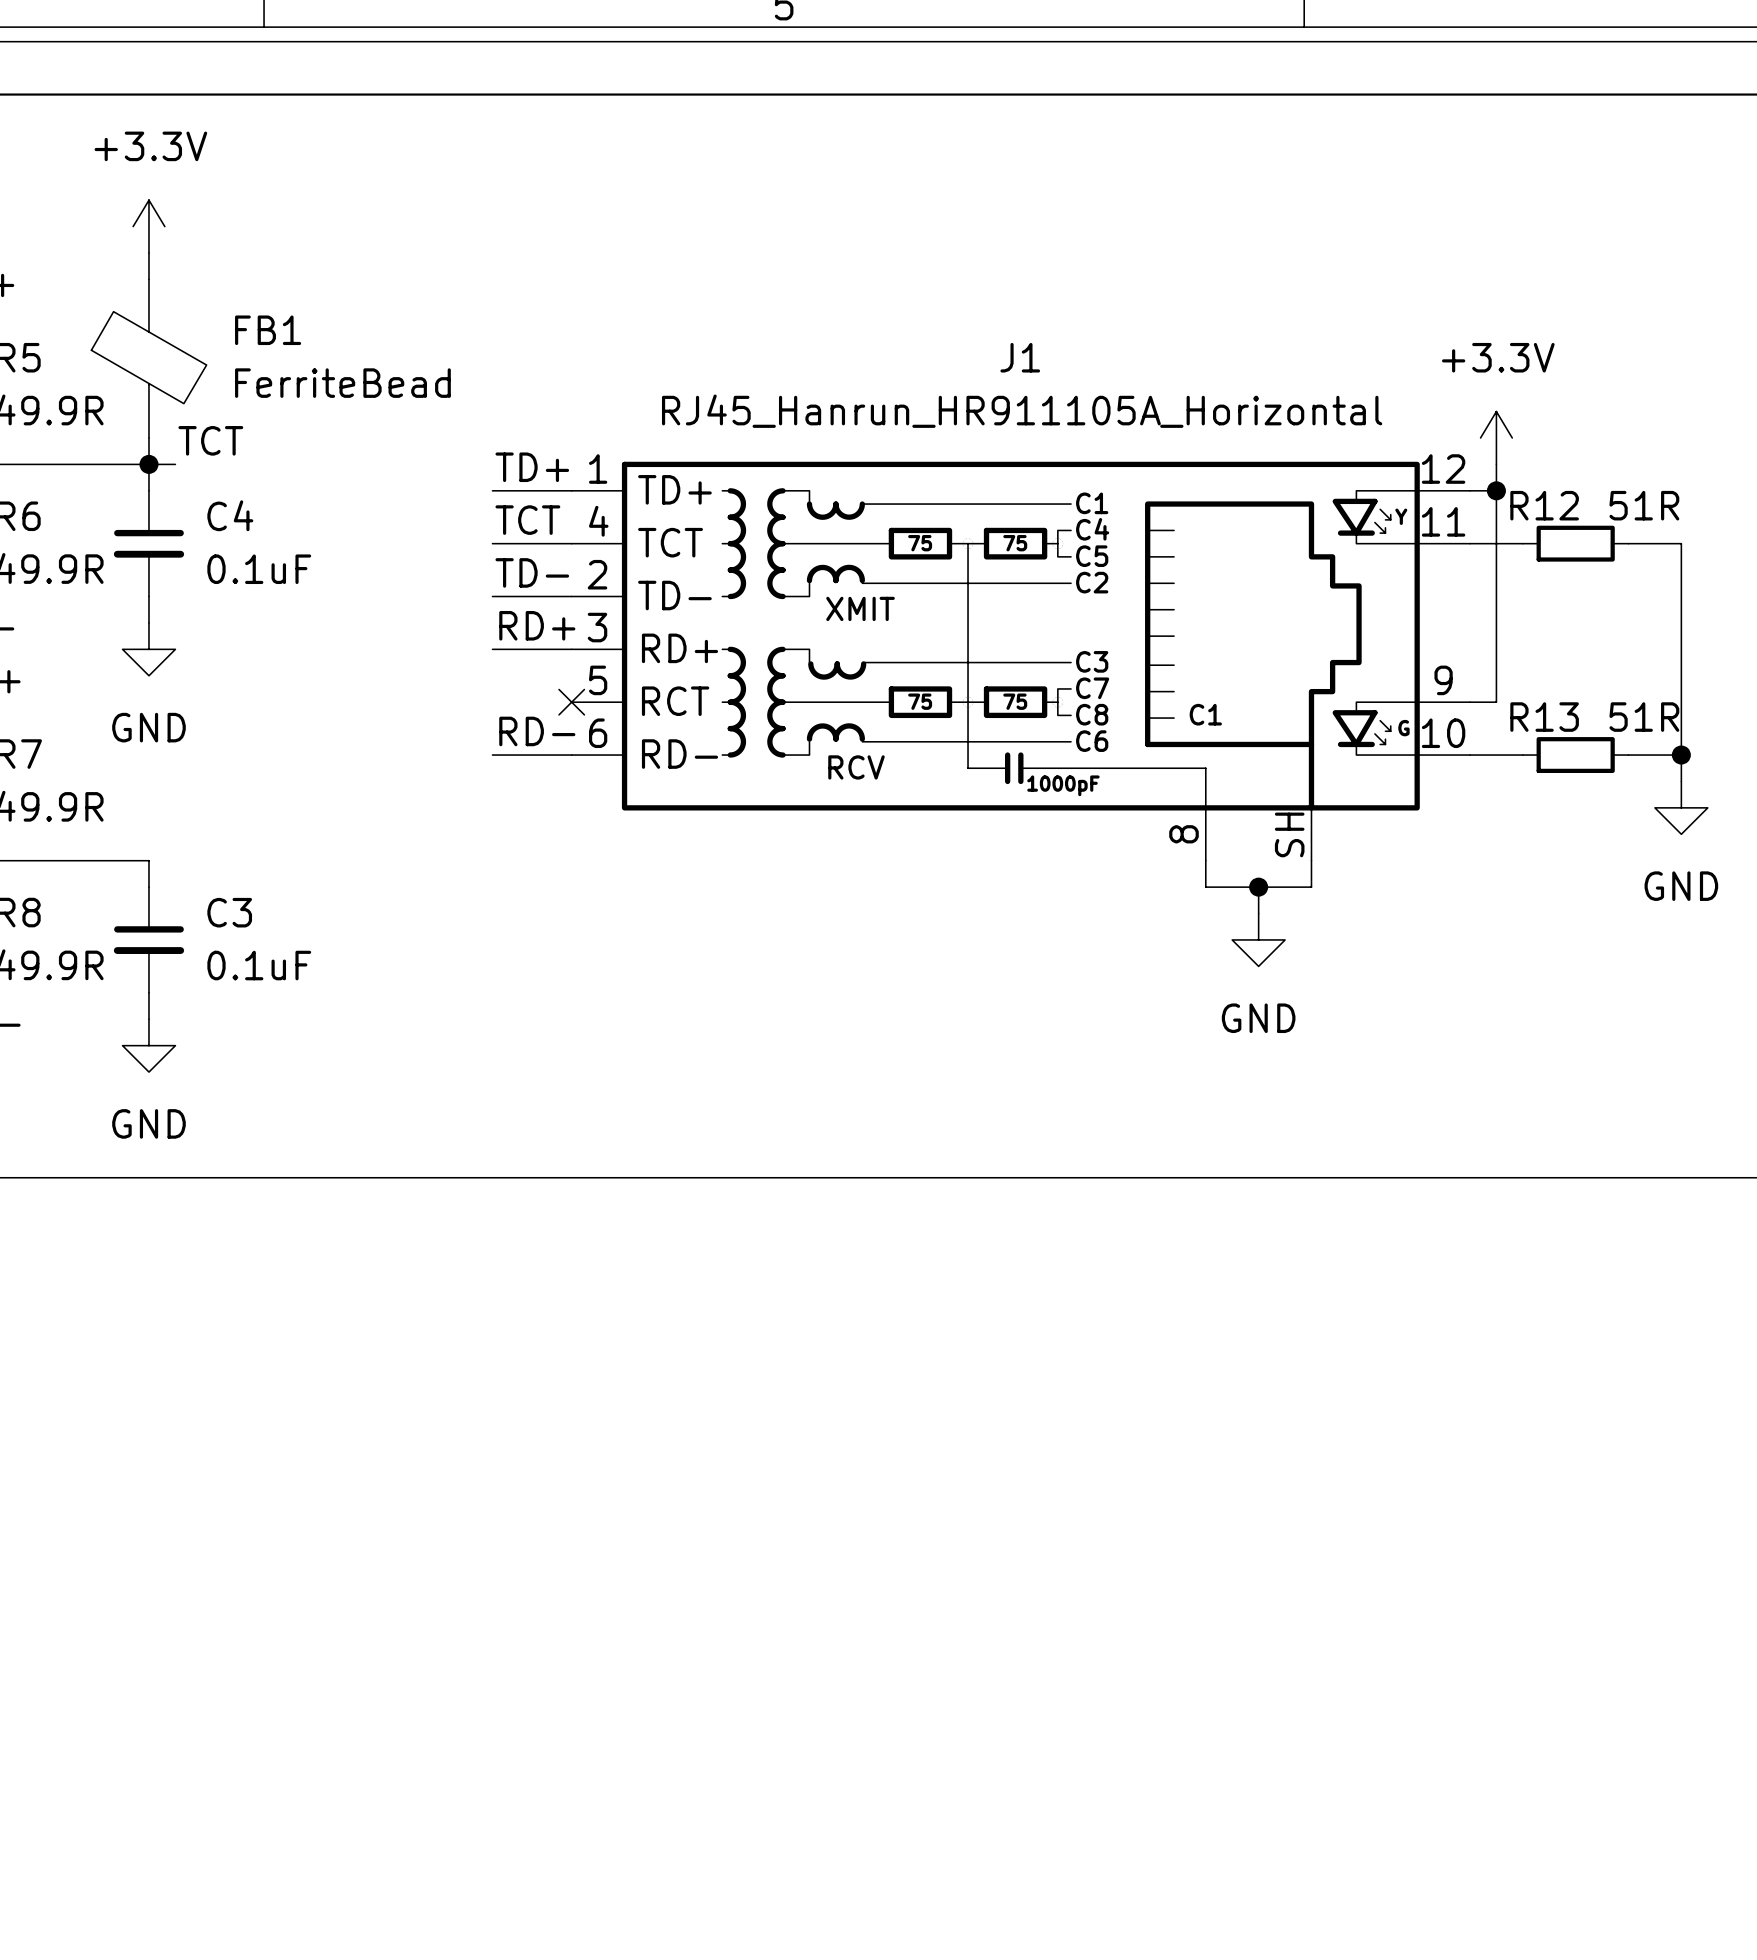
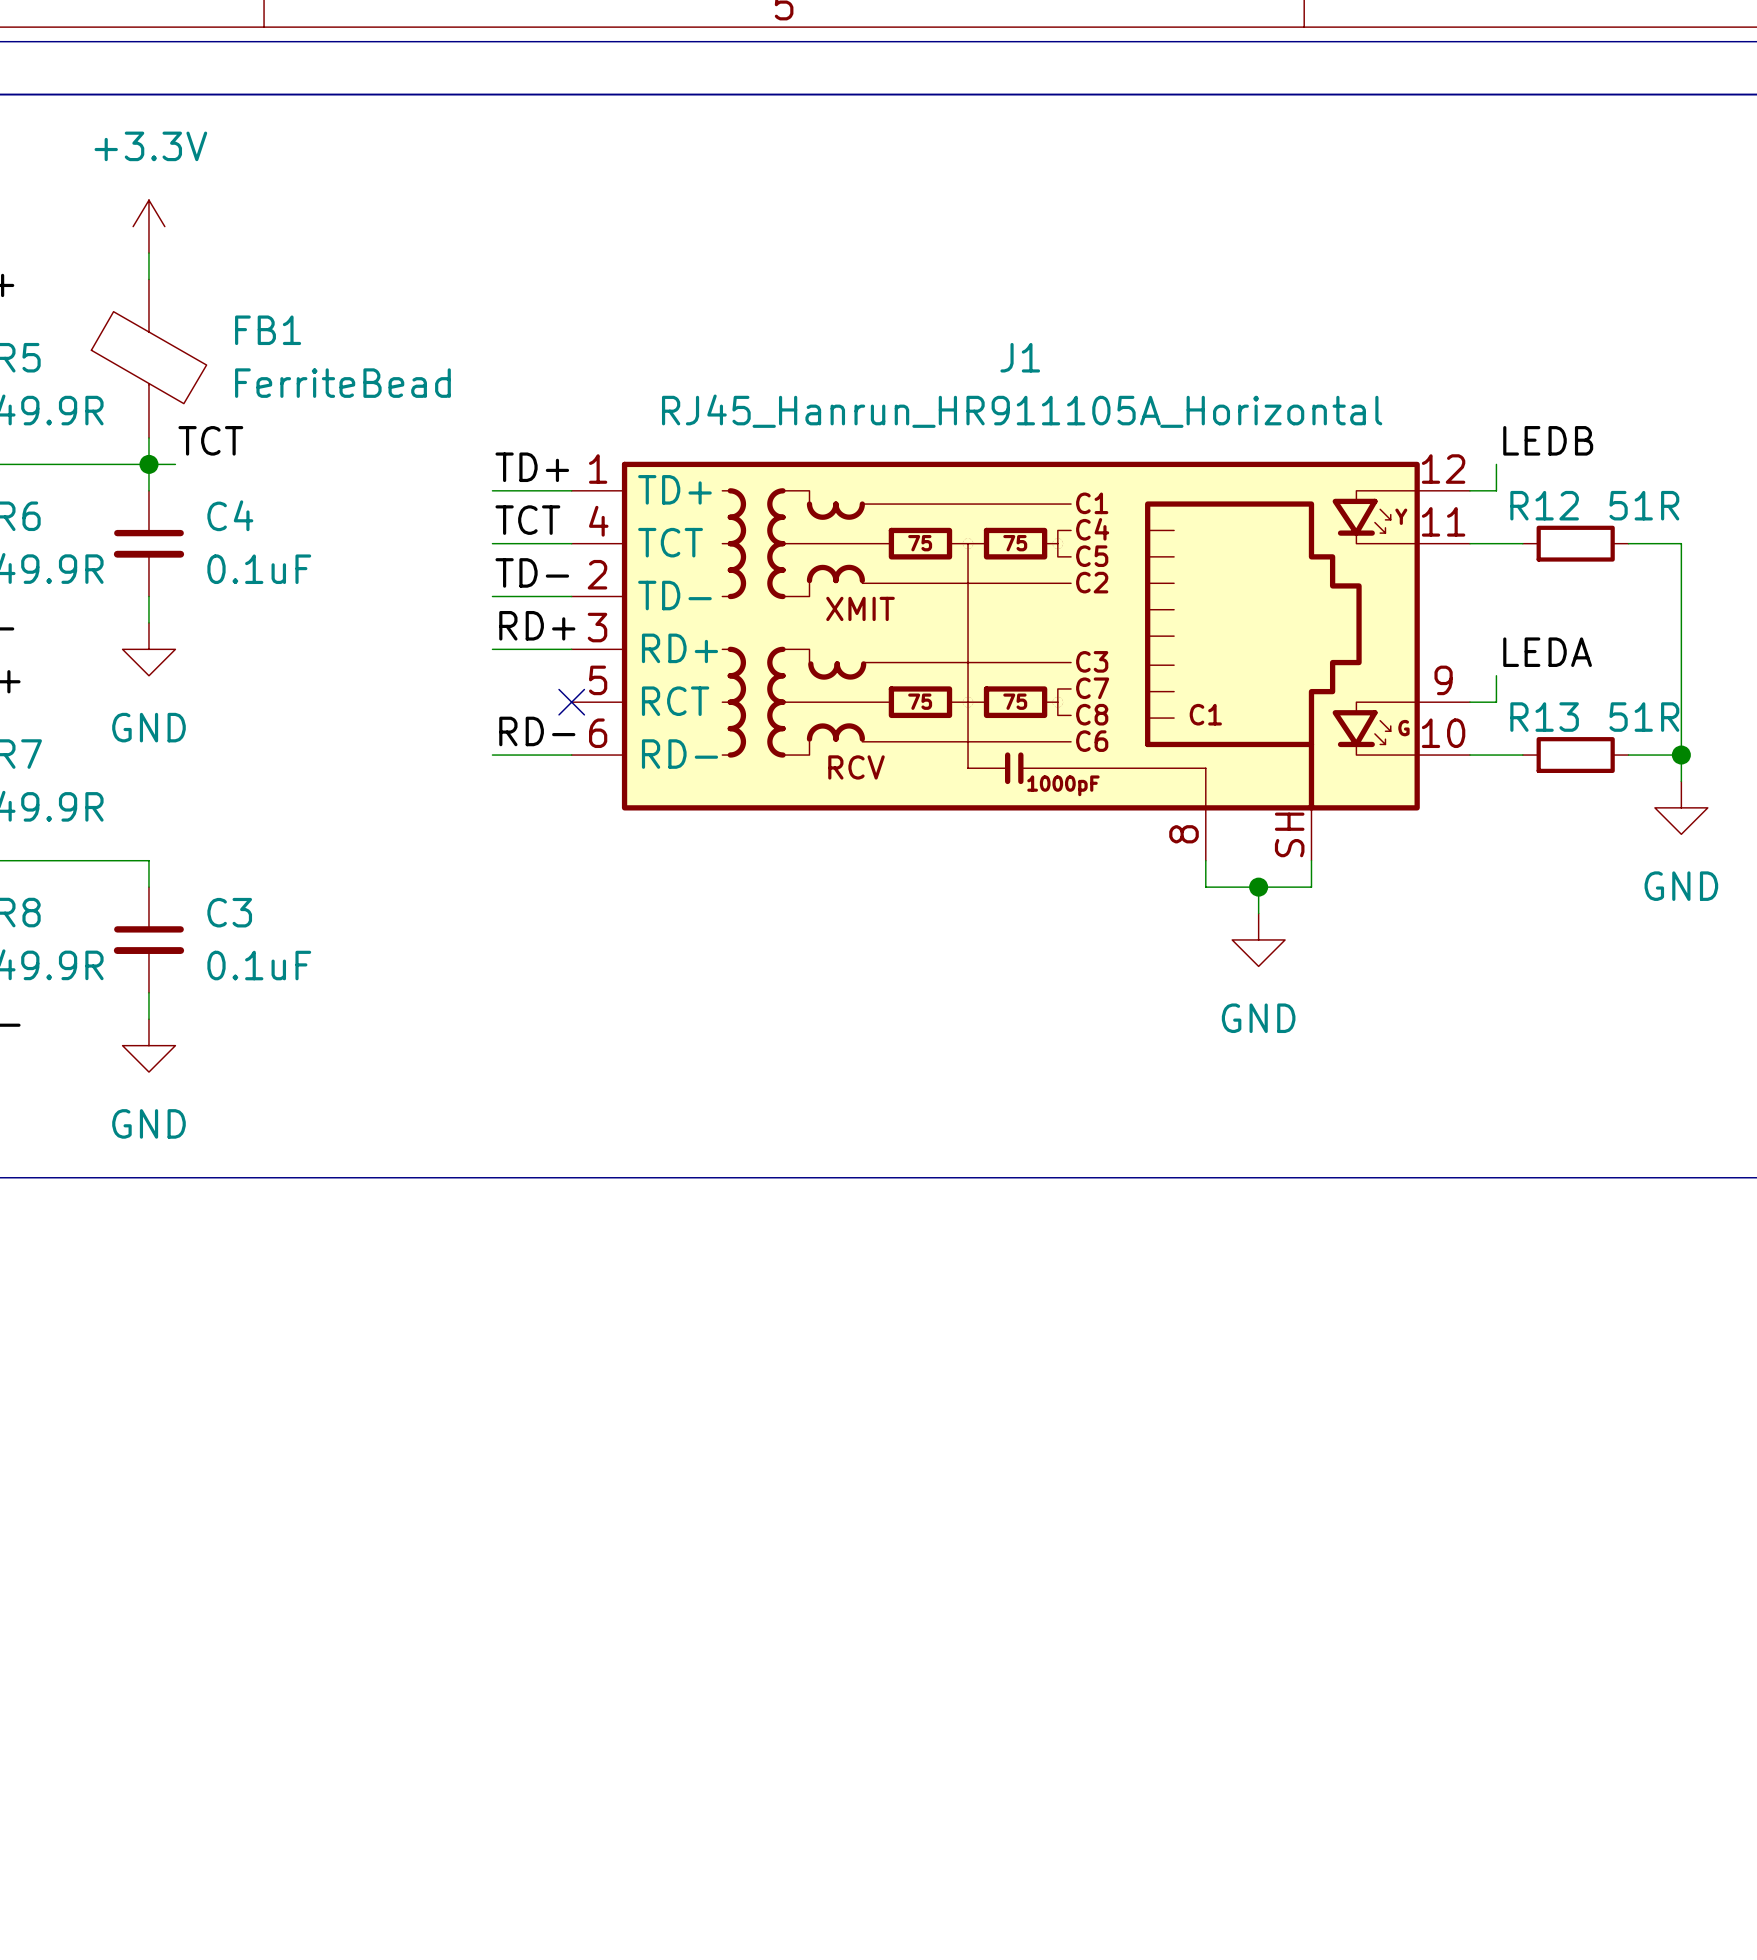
power symbol: +3.3V (1496, 437) -> none
label: none -> LEDB (1548, 440)
wire: (1496, 490) (1496, 675) -> none
junction: (1496, 490) -> none
label: none -> LEDA (1547, 652)

